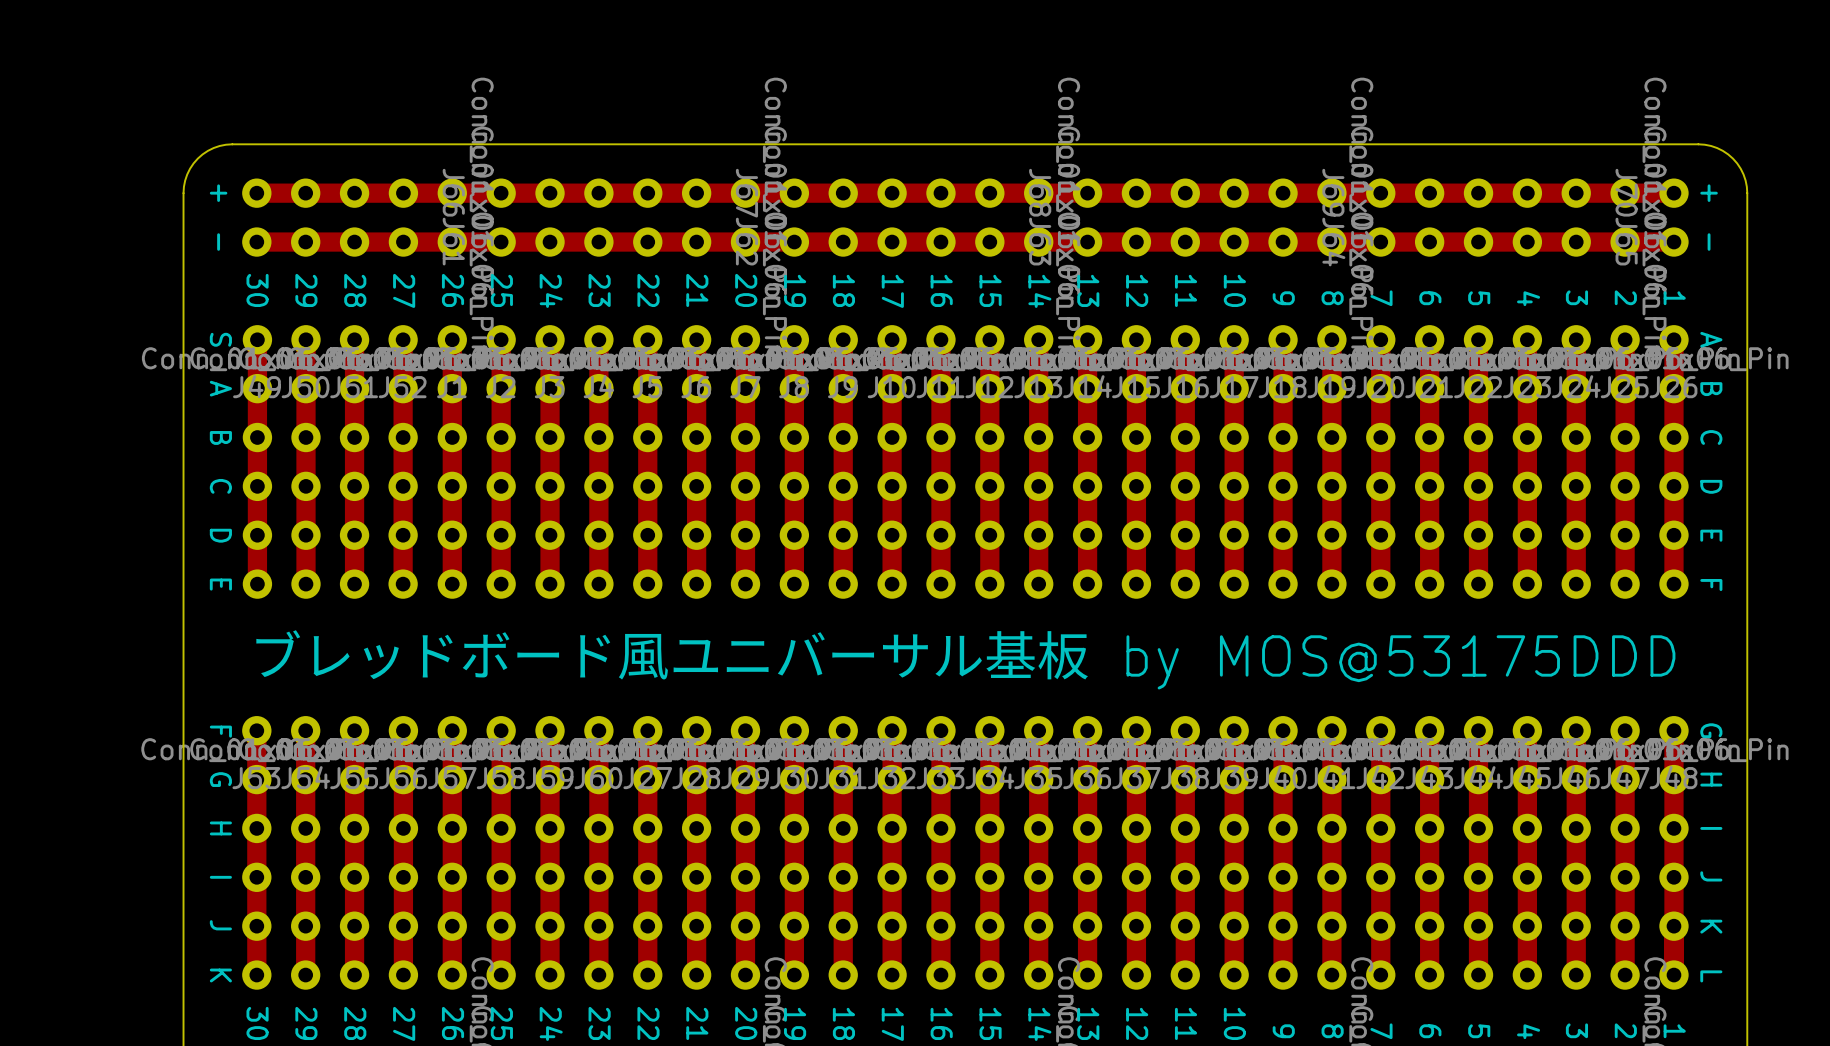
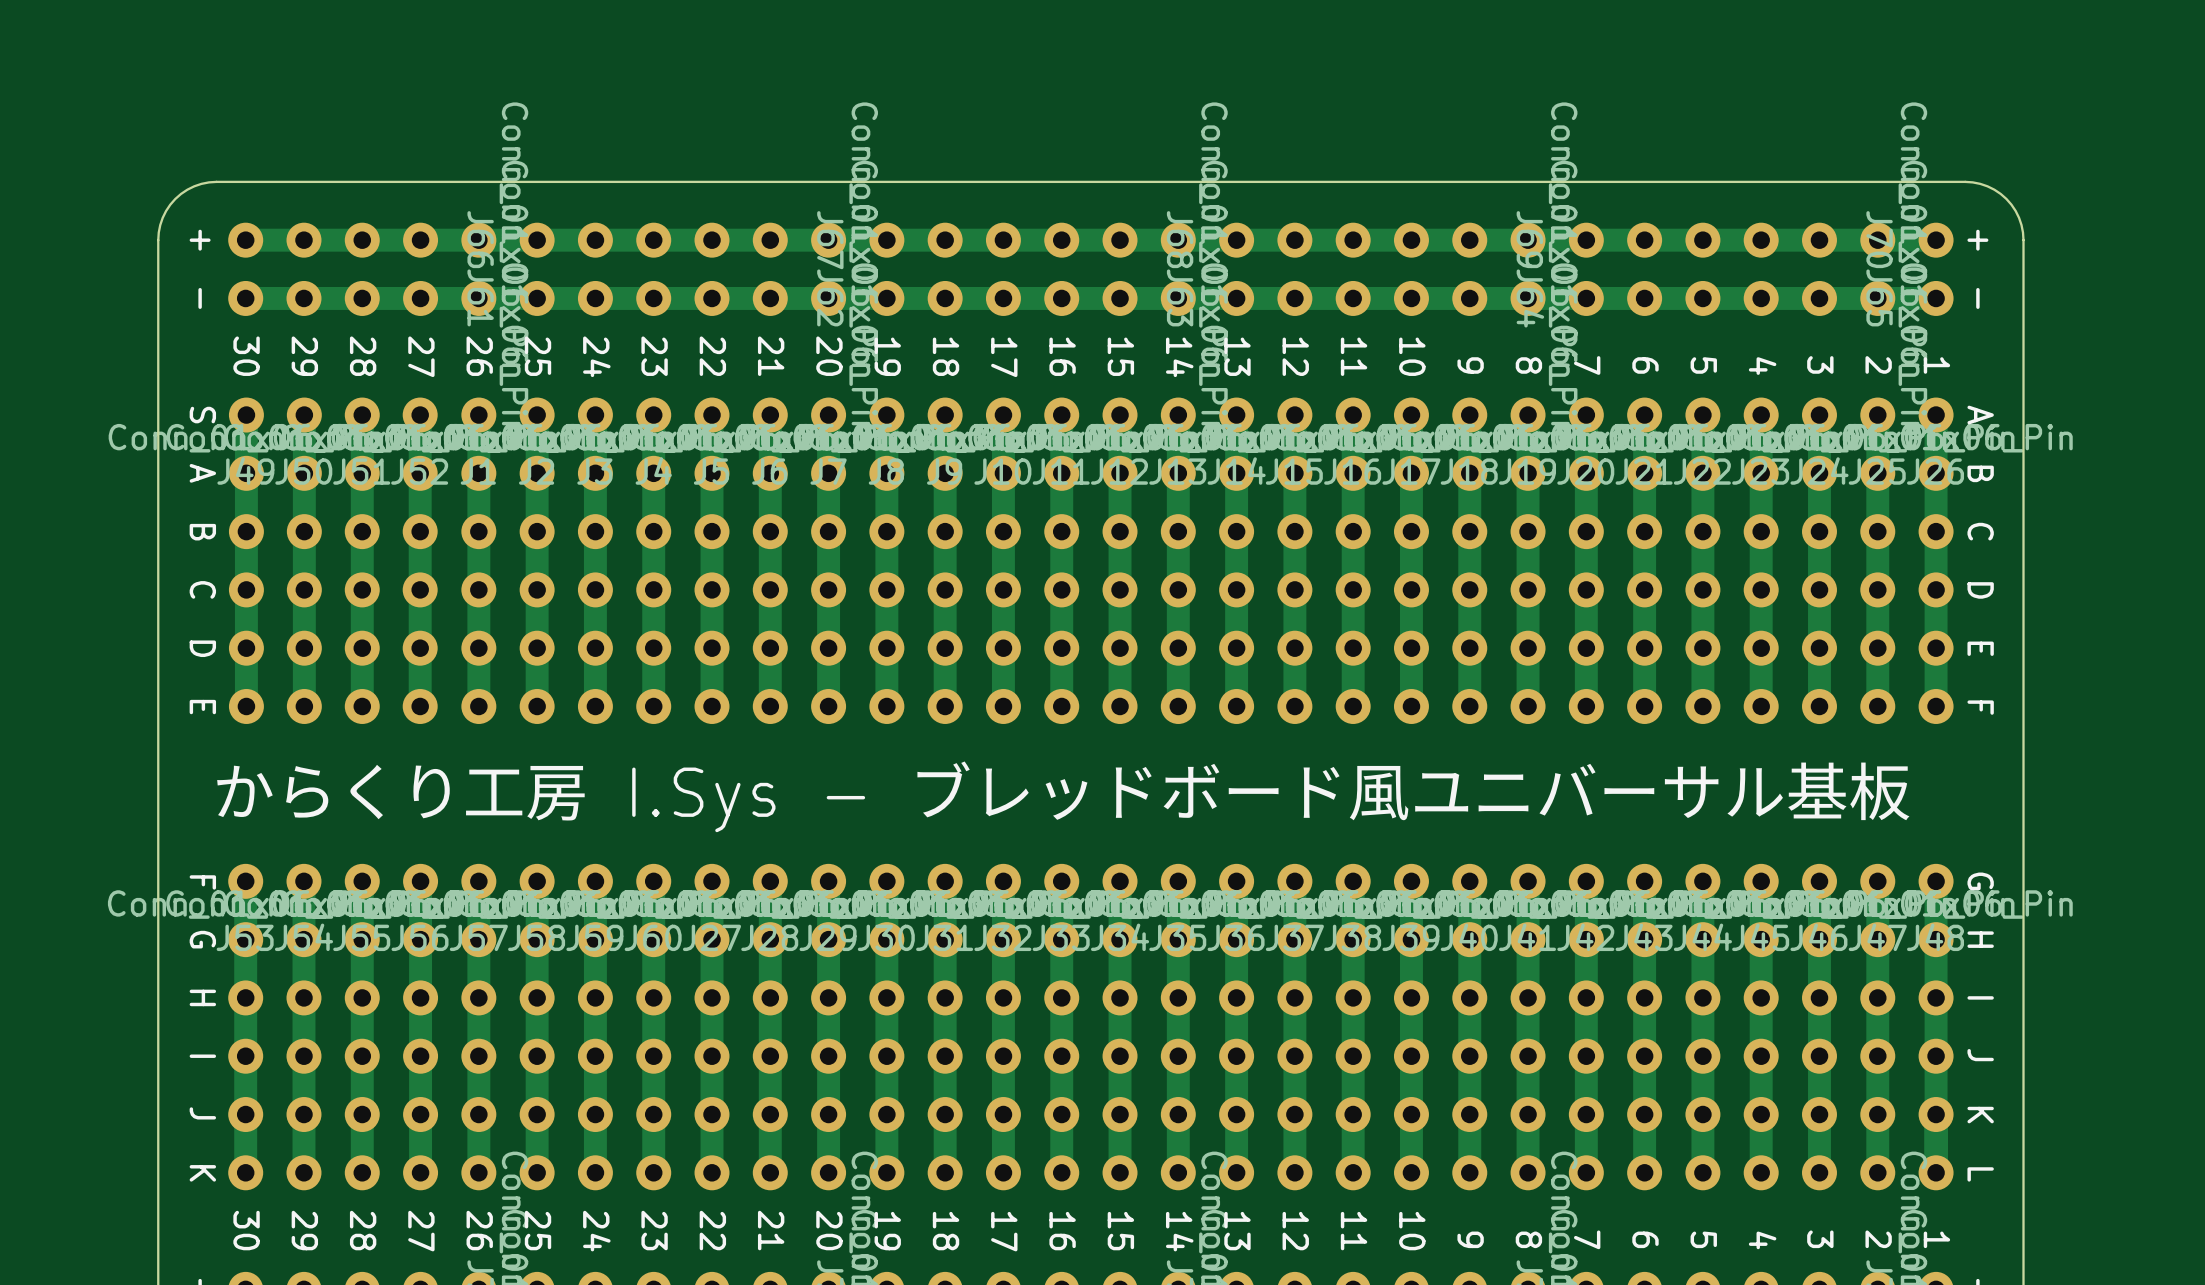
text: none -> からくり工房 I.Sys - ブレッドボード風ユニバーサル基板 (1063, 795)
text: ブレッドボード風ユニバーサル基板 by MOS@53175DDD (965, 659) -> none

